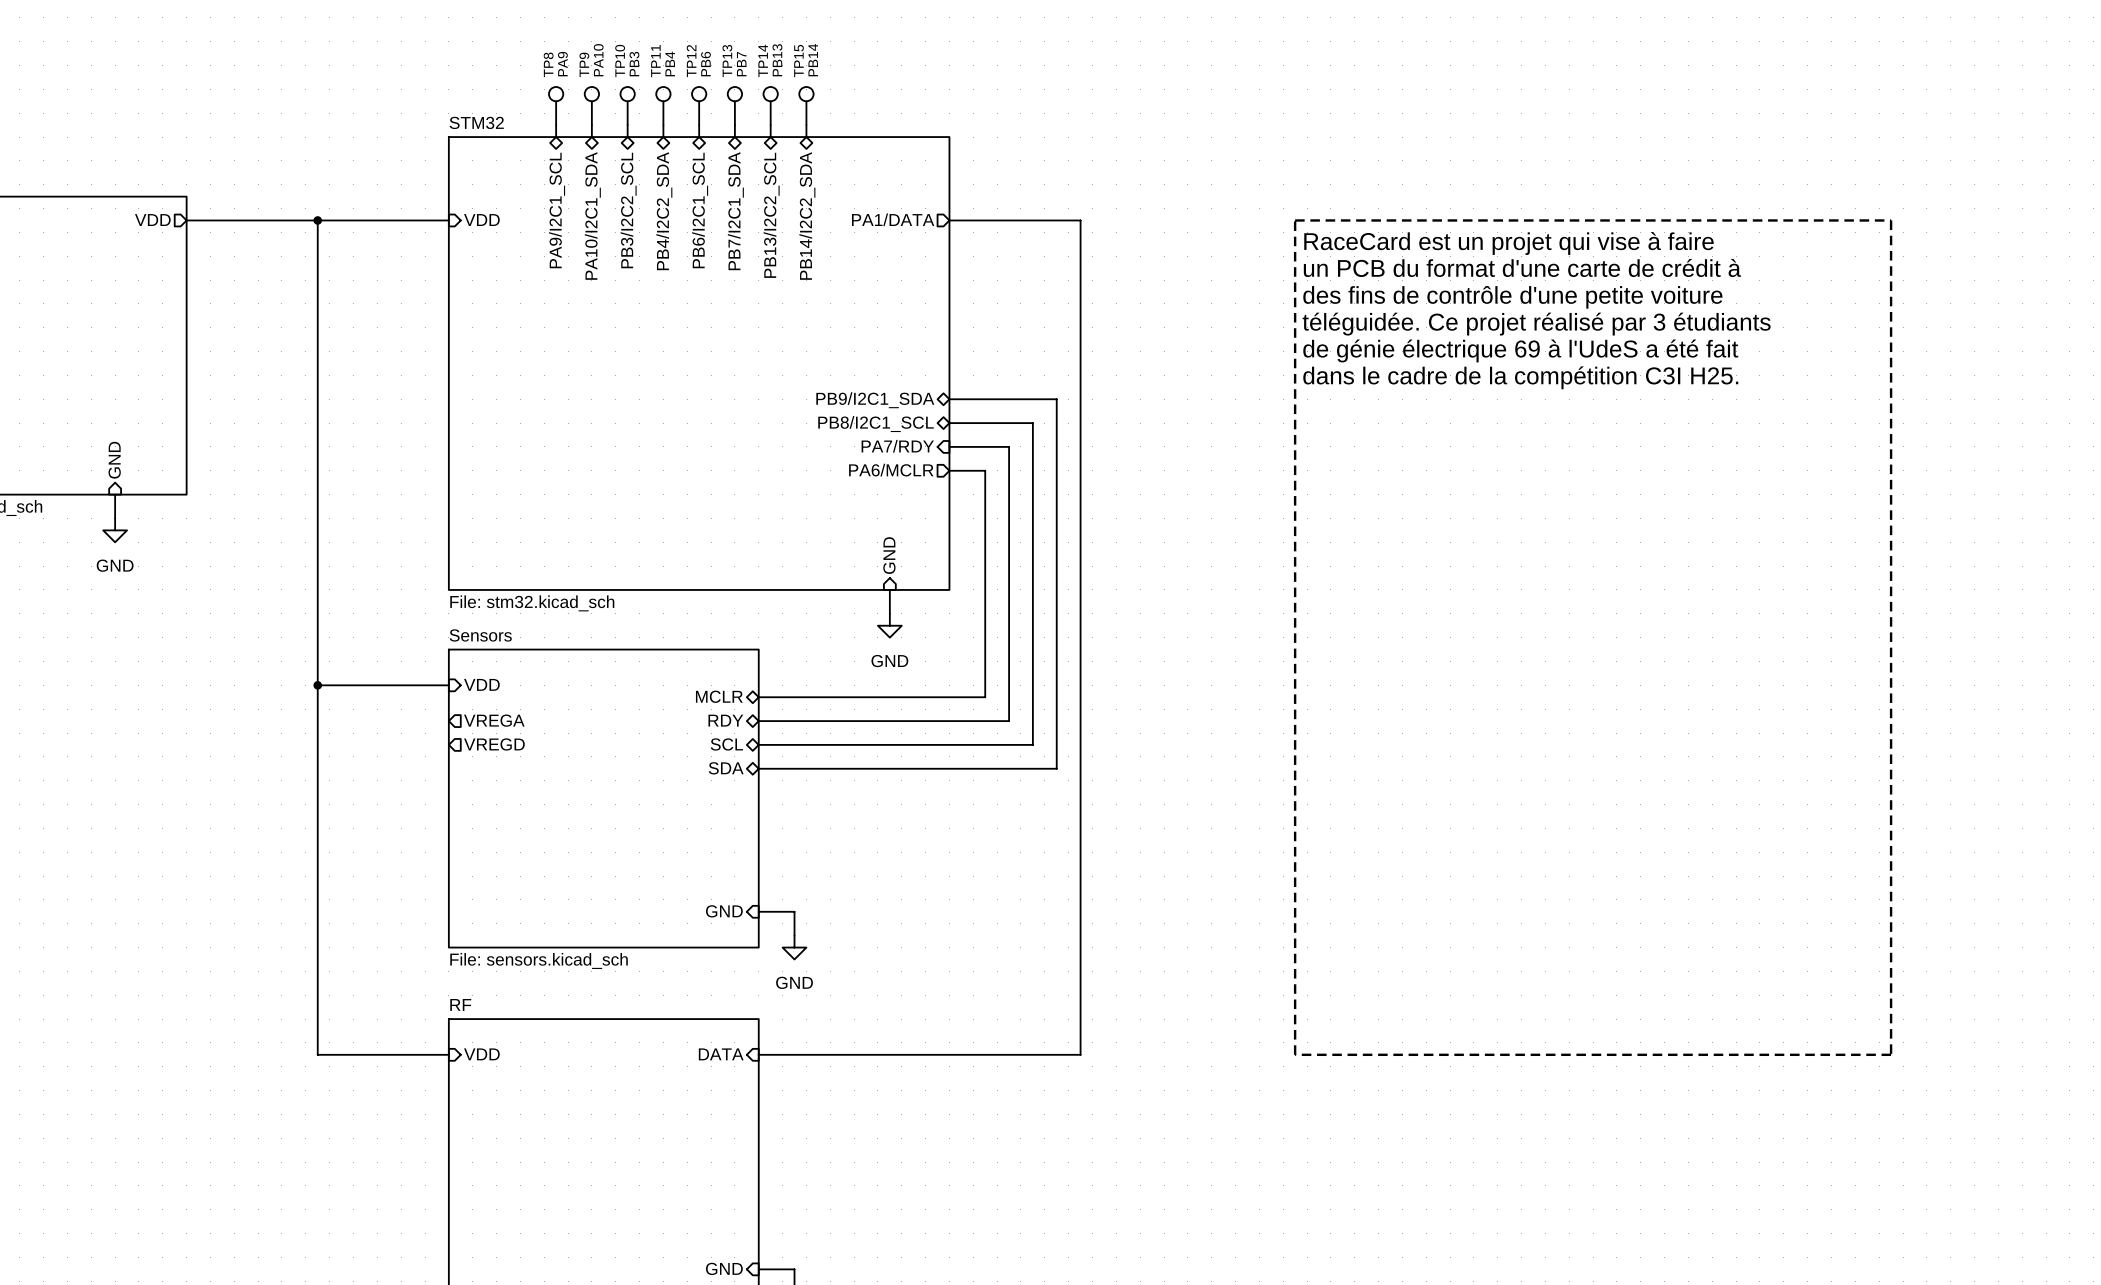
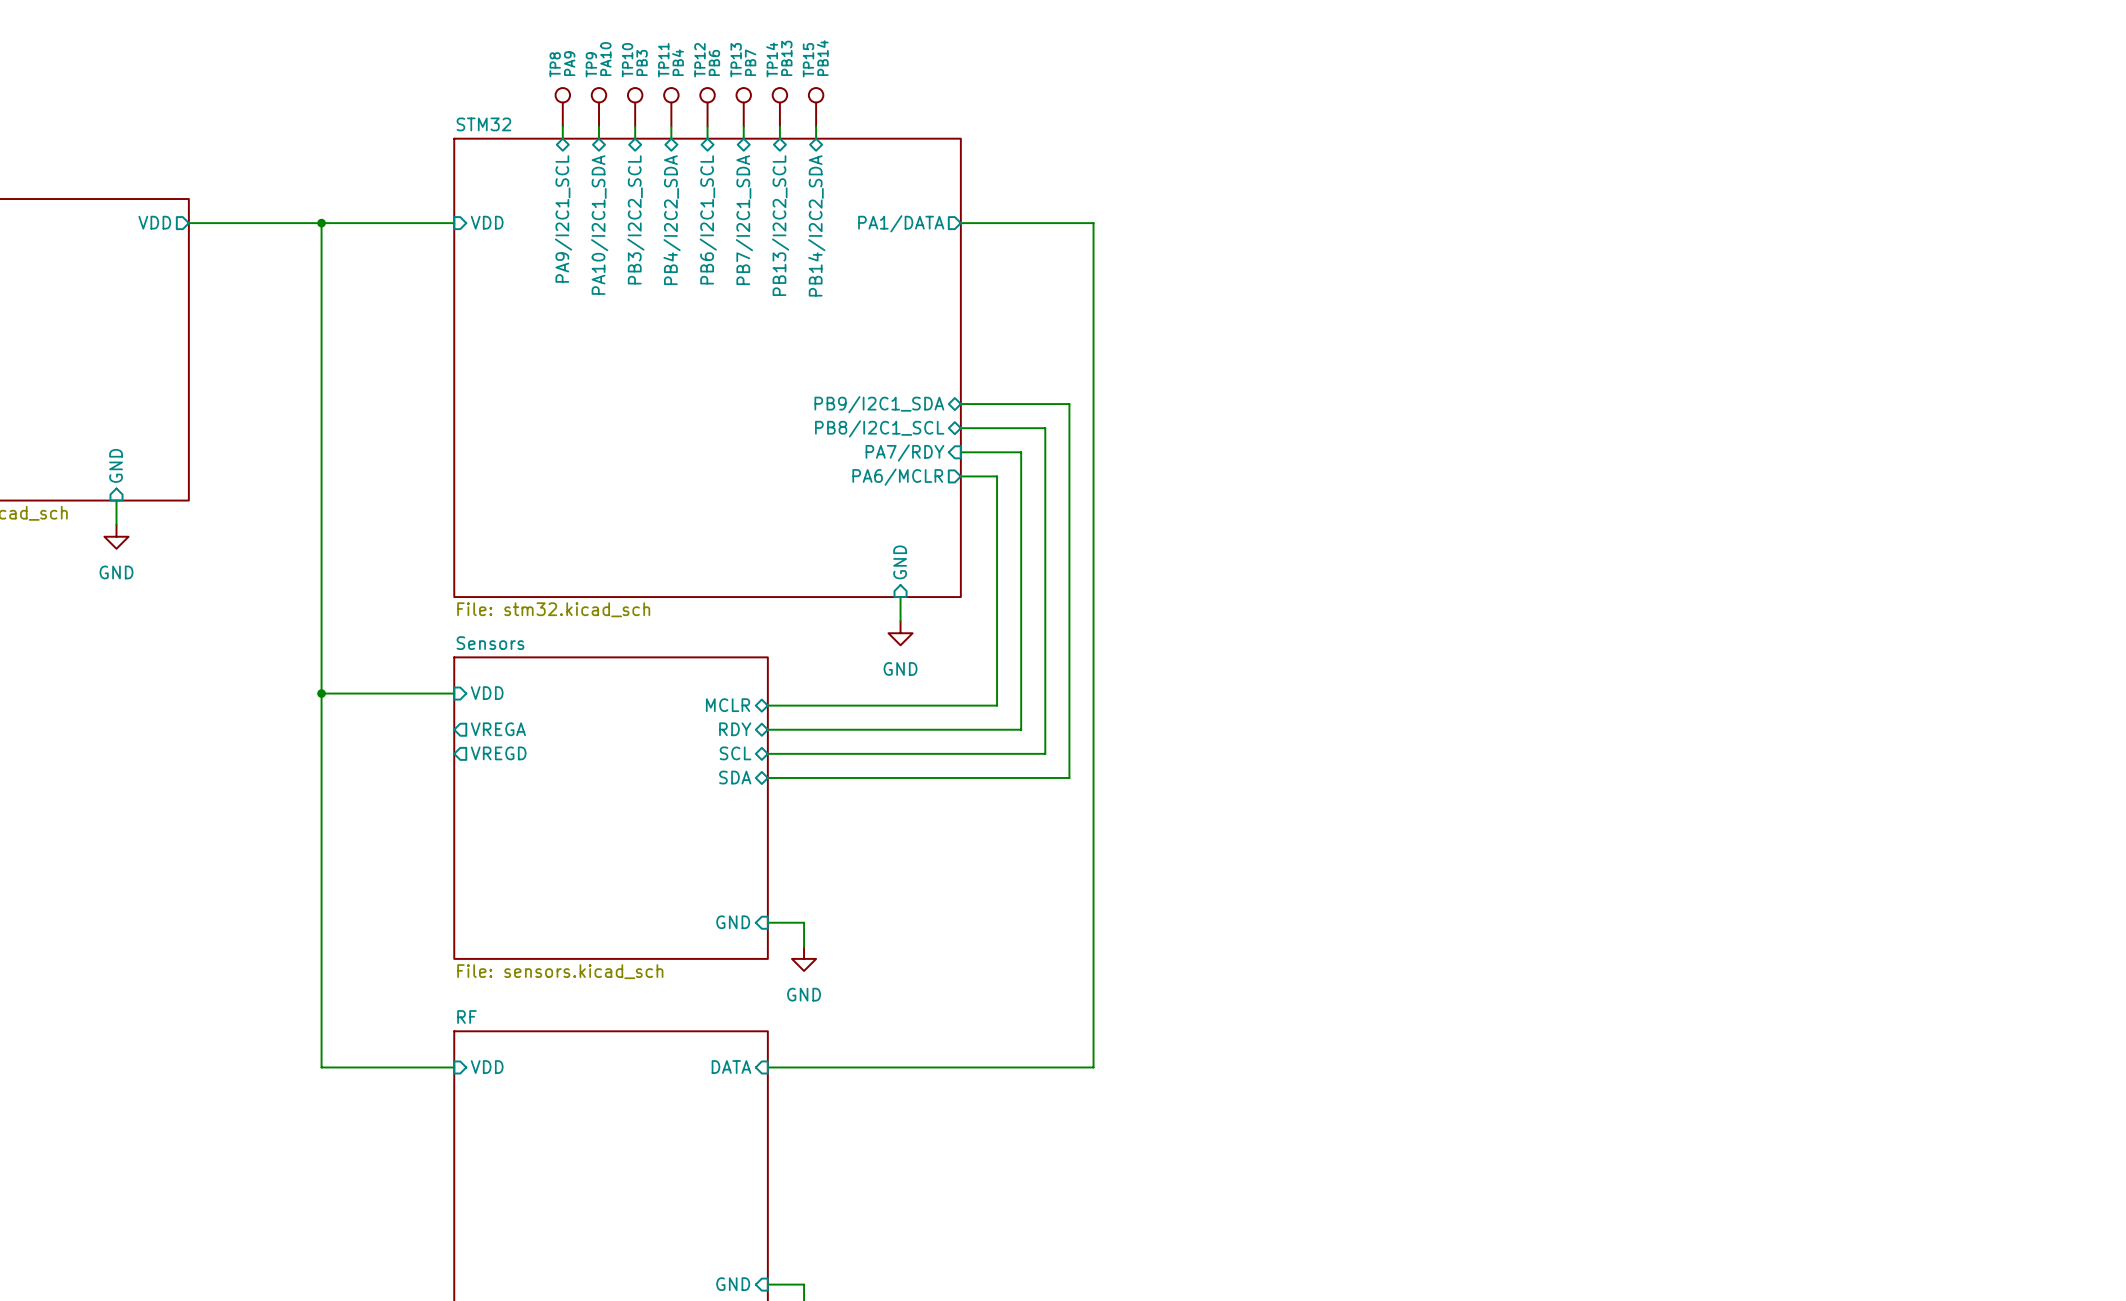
line: (1295, 220) (1891, 220) (1891, 1054) (1295, 1054) (1295, 220) -> none
text: RaceCard est un projet qui vise à faire (1509, 243) -> none
text: un PCB du format d'une carte de crédit à (1522, 267) -> none
text: des fins de contrôle d'une petite voiture (1512, 297) -> none
text: téléguidée. Ce projet réalisé par 3 étudiants (1536, 324) -> none
text: de génie électrique 69 à l'UdeS a été fait (1520, 350) -> none
text: dans le cadre de la compétition C3I H25. (1520, 377) -> none

